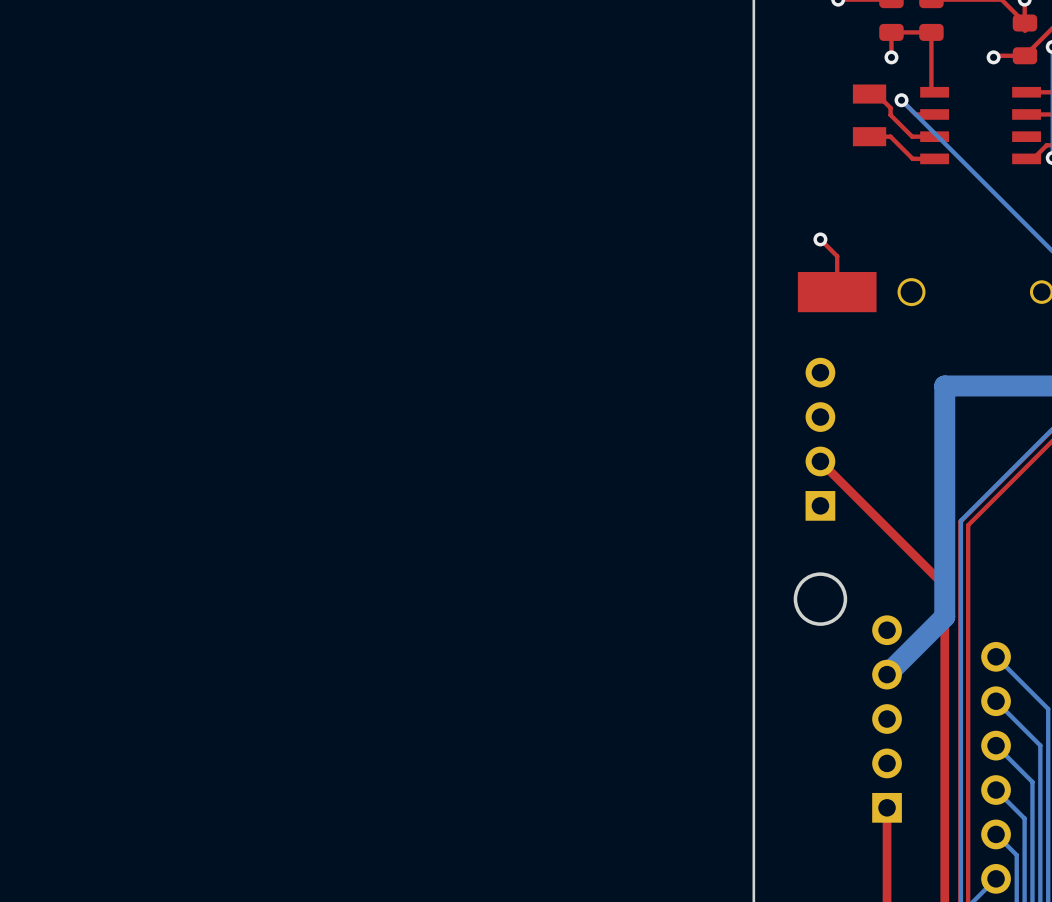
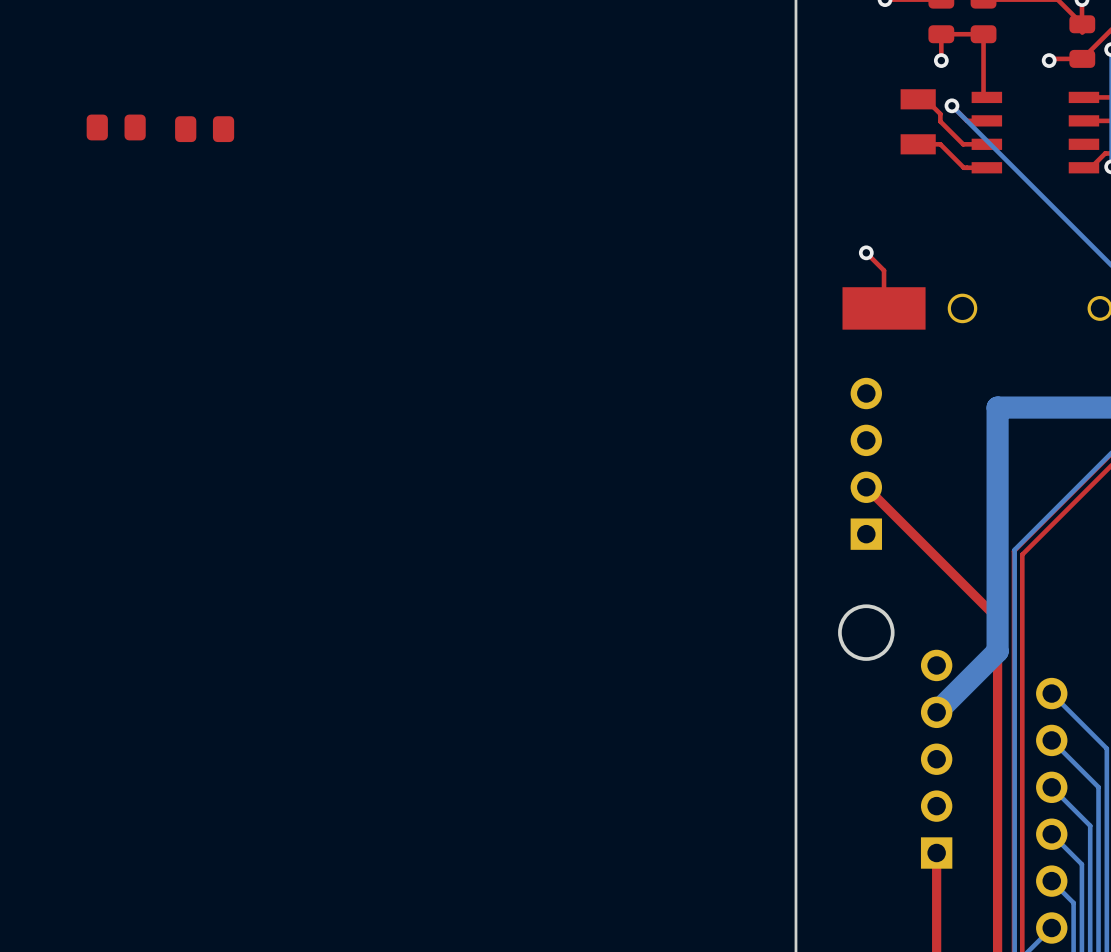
part: none -> (116, 127)
part: none -> (204, 129)

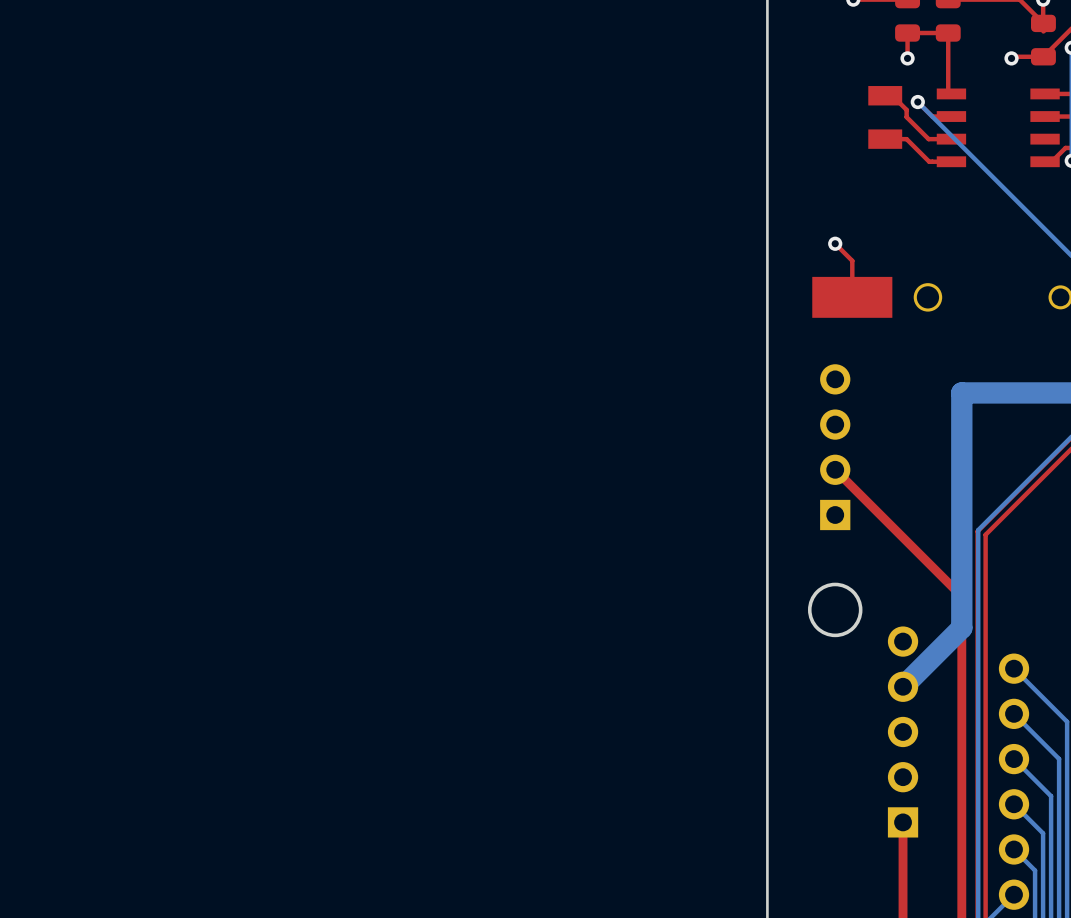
part: (116, 127) -> none
part: (204, 129) -> none

